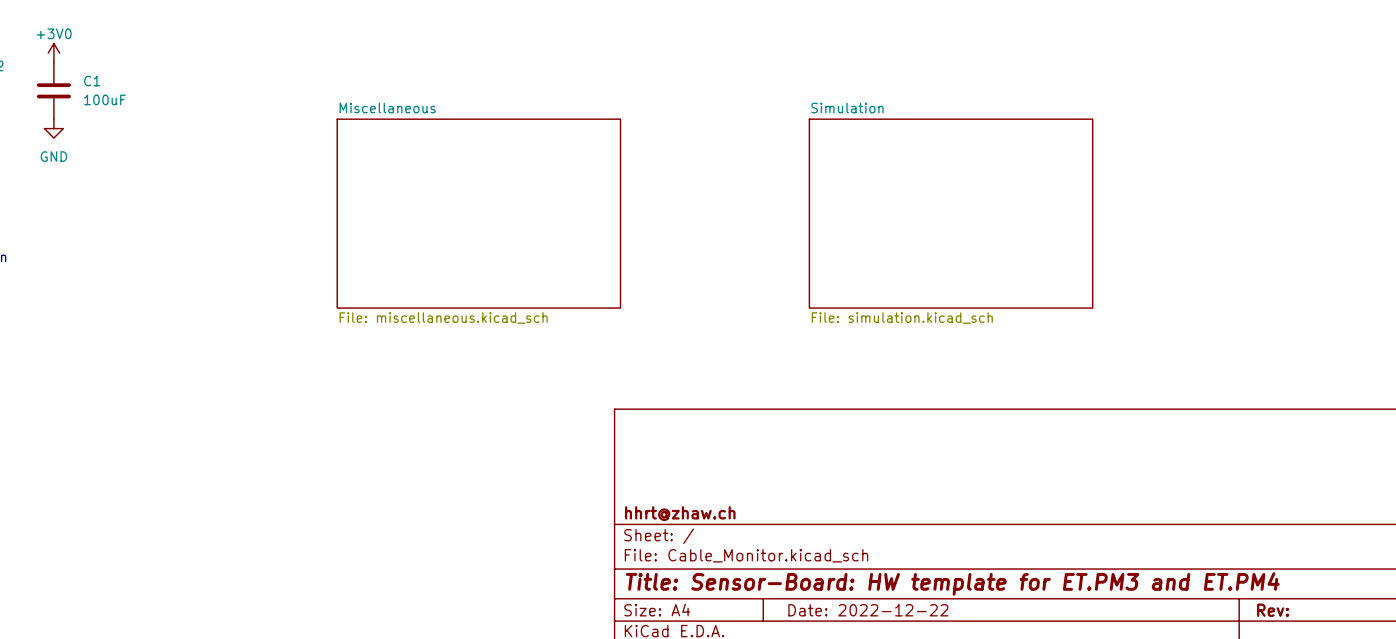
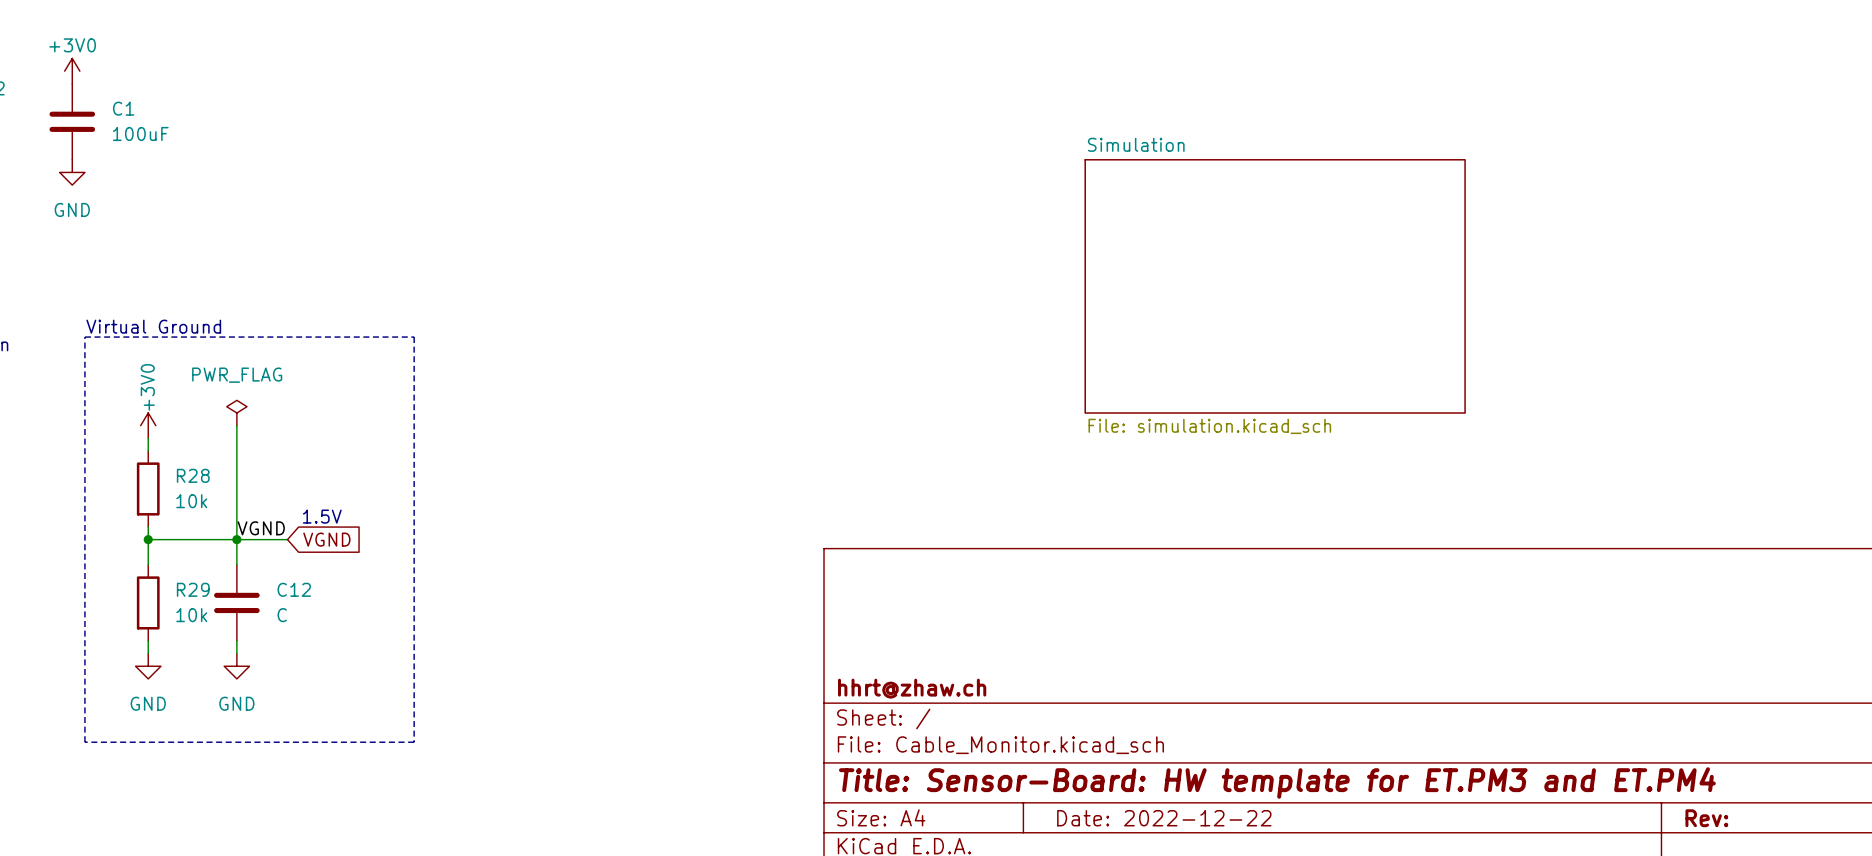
sheet Miscellaneous: File: miscellaneous.kicad_sch (478, 213) -> none
text: none -> Virtual Ground (153, 326)
line: none -> (84, 337) (414, 337) (414, 742) (84, 742) (84, 337)
power symbol: none -> PWR_FLAG (236, 413)
power symbol: none -> +3V0 (148, 425)
wire: none -> (236, 425) (236, 564)
wire: none -> (148, 438) (148, 451)
R28: none -> 10k (148, 488)
text: none -> 1.5V (322, 516)
wire: none -> (148, 526) (148, 564)
label: none -> VGND (261, 528)
wire: none -> (148, 539) (287, 539)
junction: none -> (148, 539)
junction: none -> (236, 539)
global label: none -> VGND (326, 539)
R29: none -> 10k (148, 602)
C12: none -> C (236, 602)
wire: none -> (148, 640) (148, 653)
wire: none -> (236, 640) (236, 653)
power symbol: none -> GND (148, 666)
power symbol: none -> GND (236, 666)

